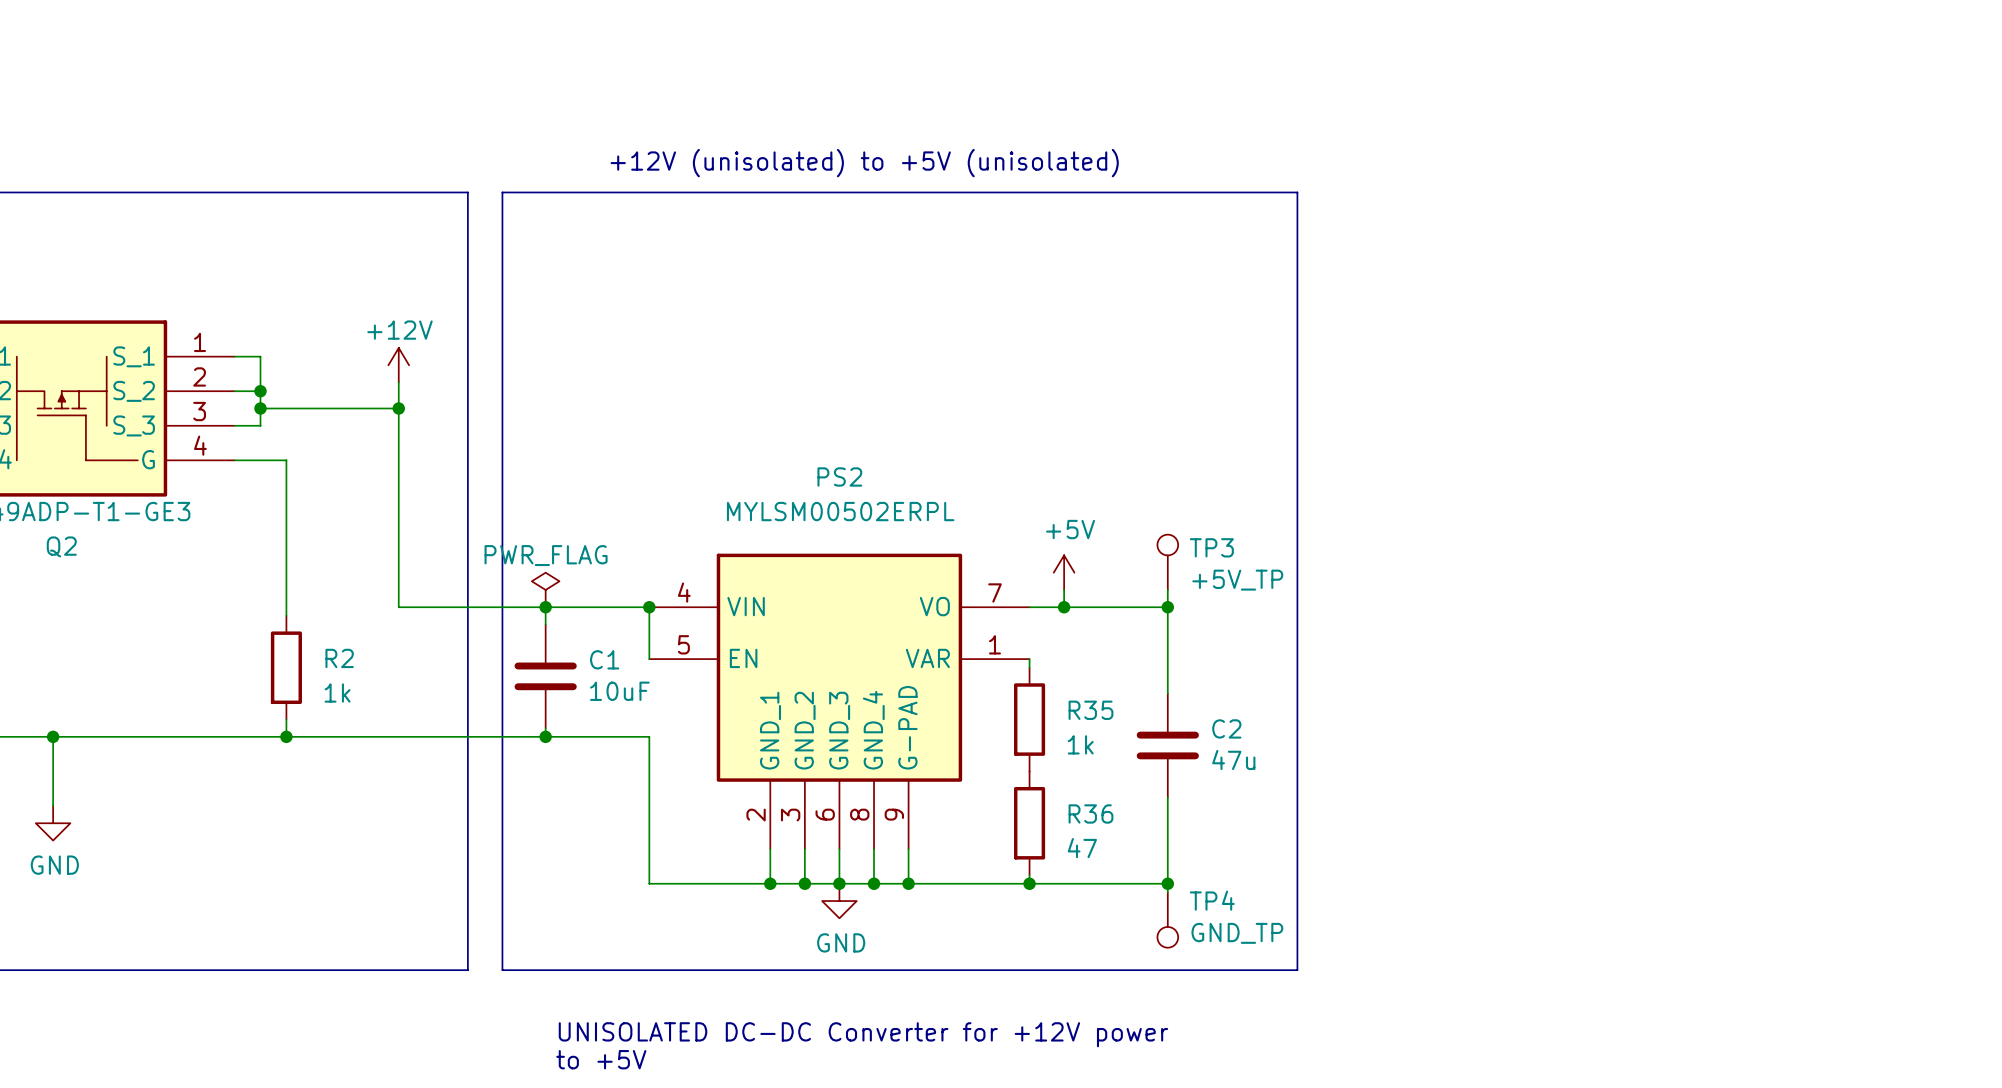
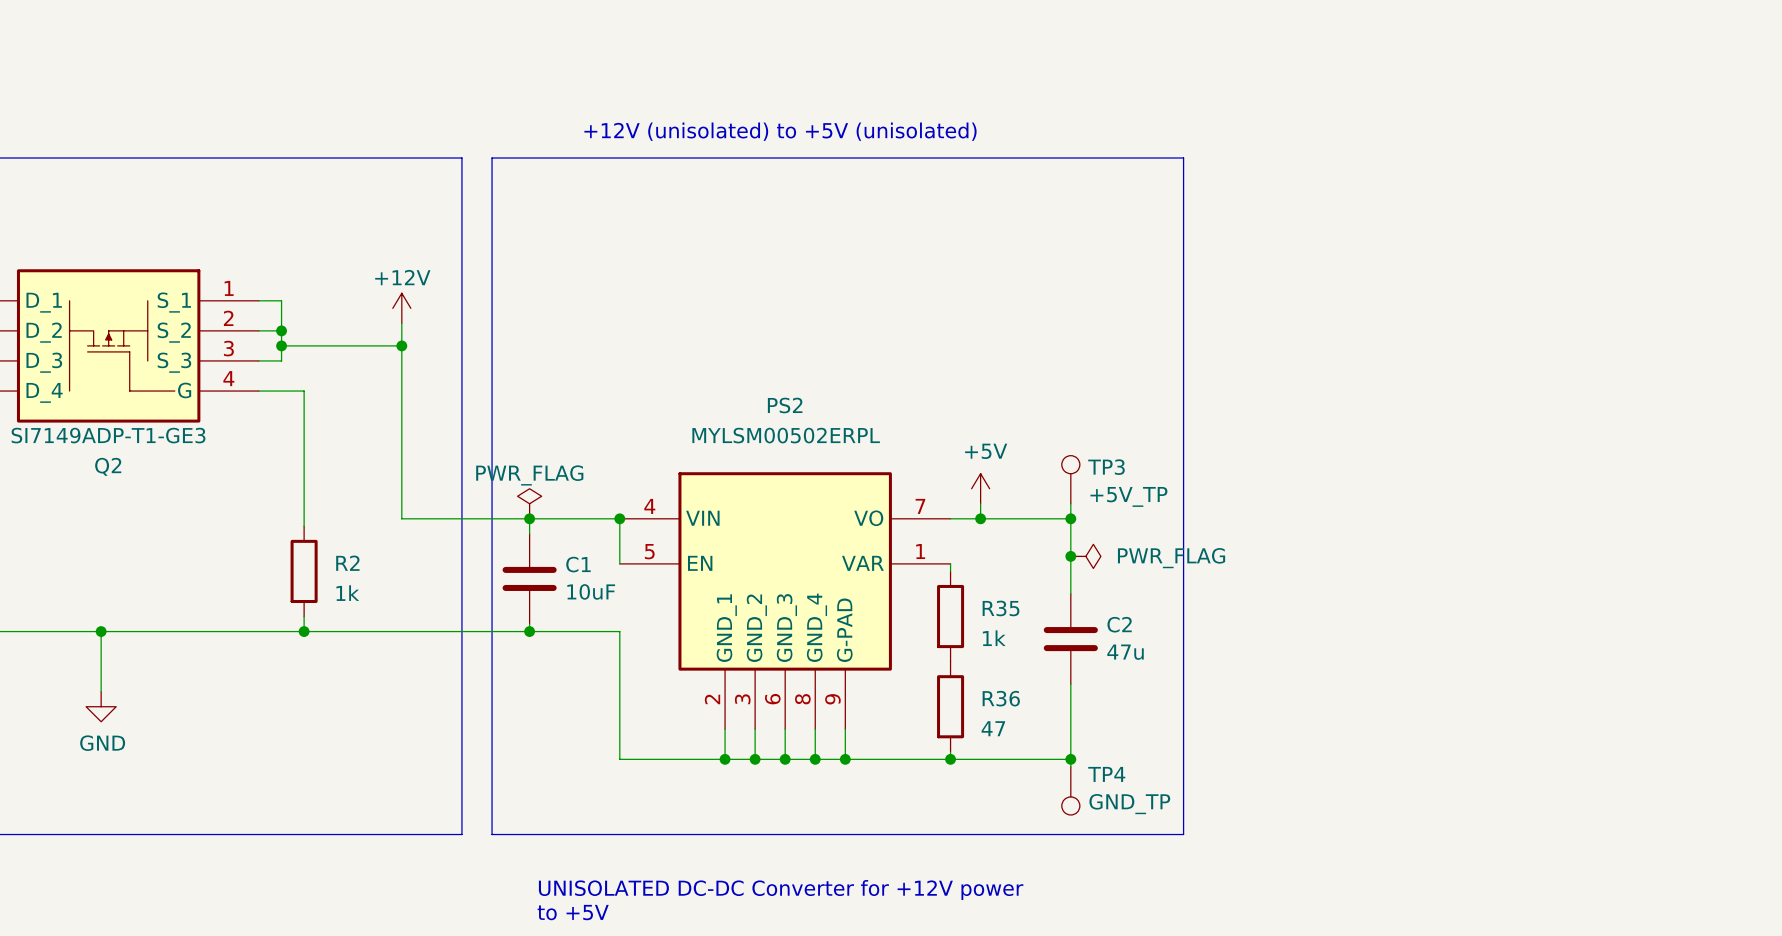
junction: none -> (1070, 556)
power symbol: none -> PWR_FLAG (1085, 556)
power symbol: GND (839, 901) -> none

